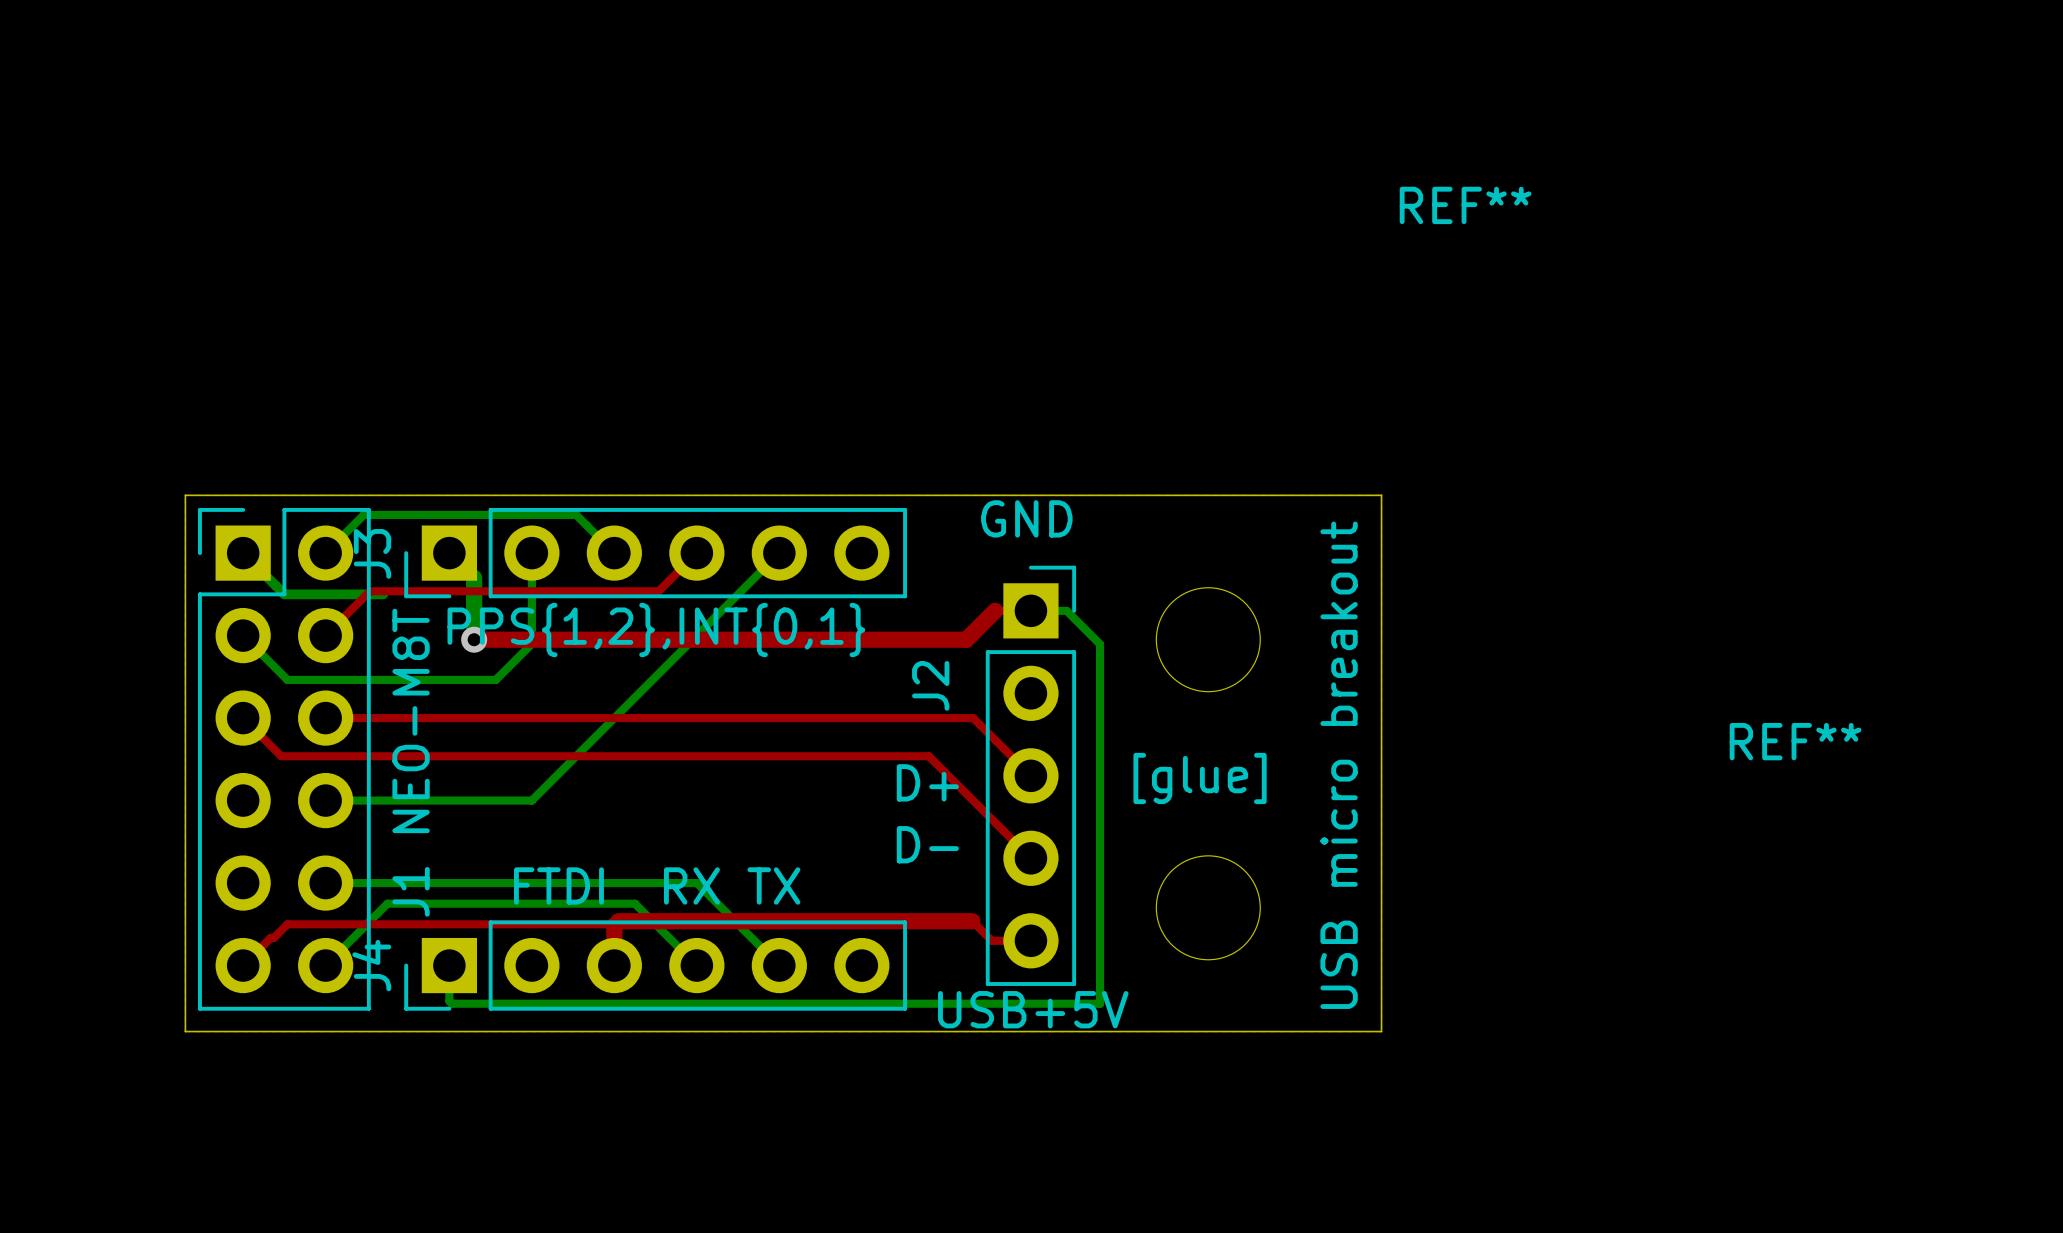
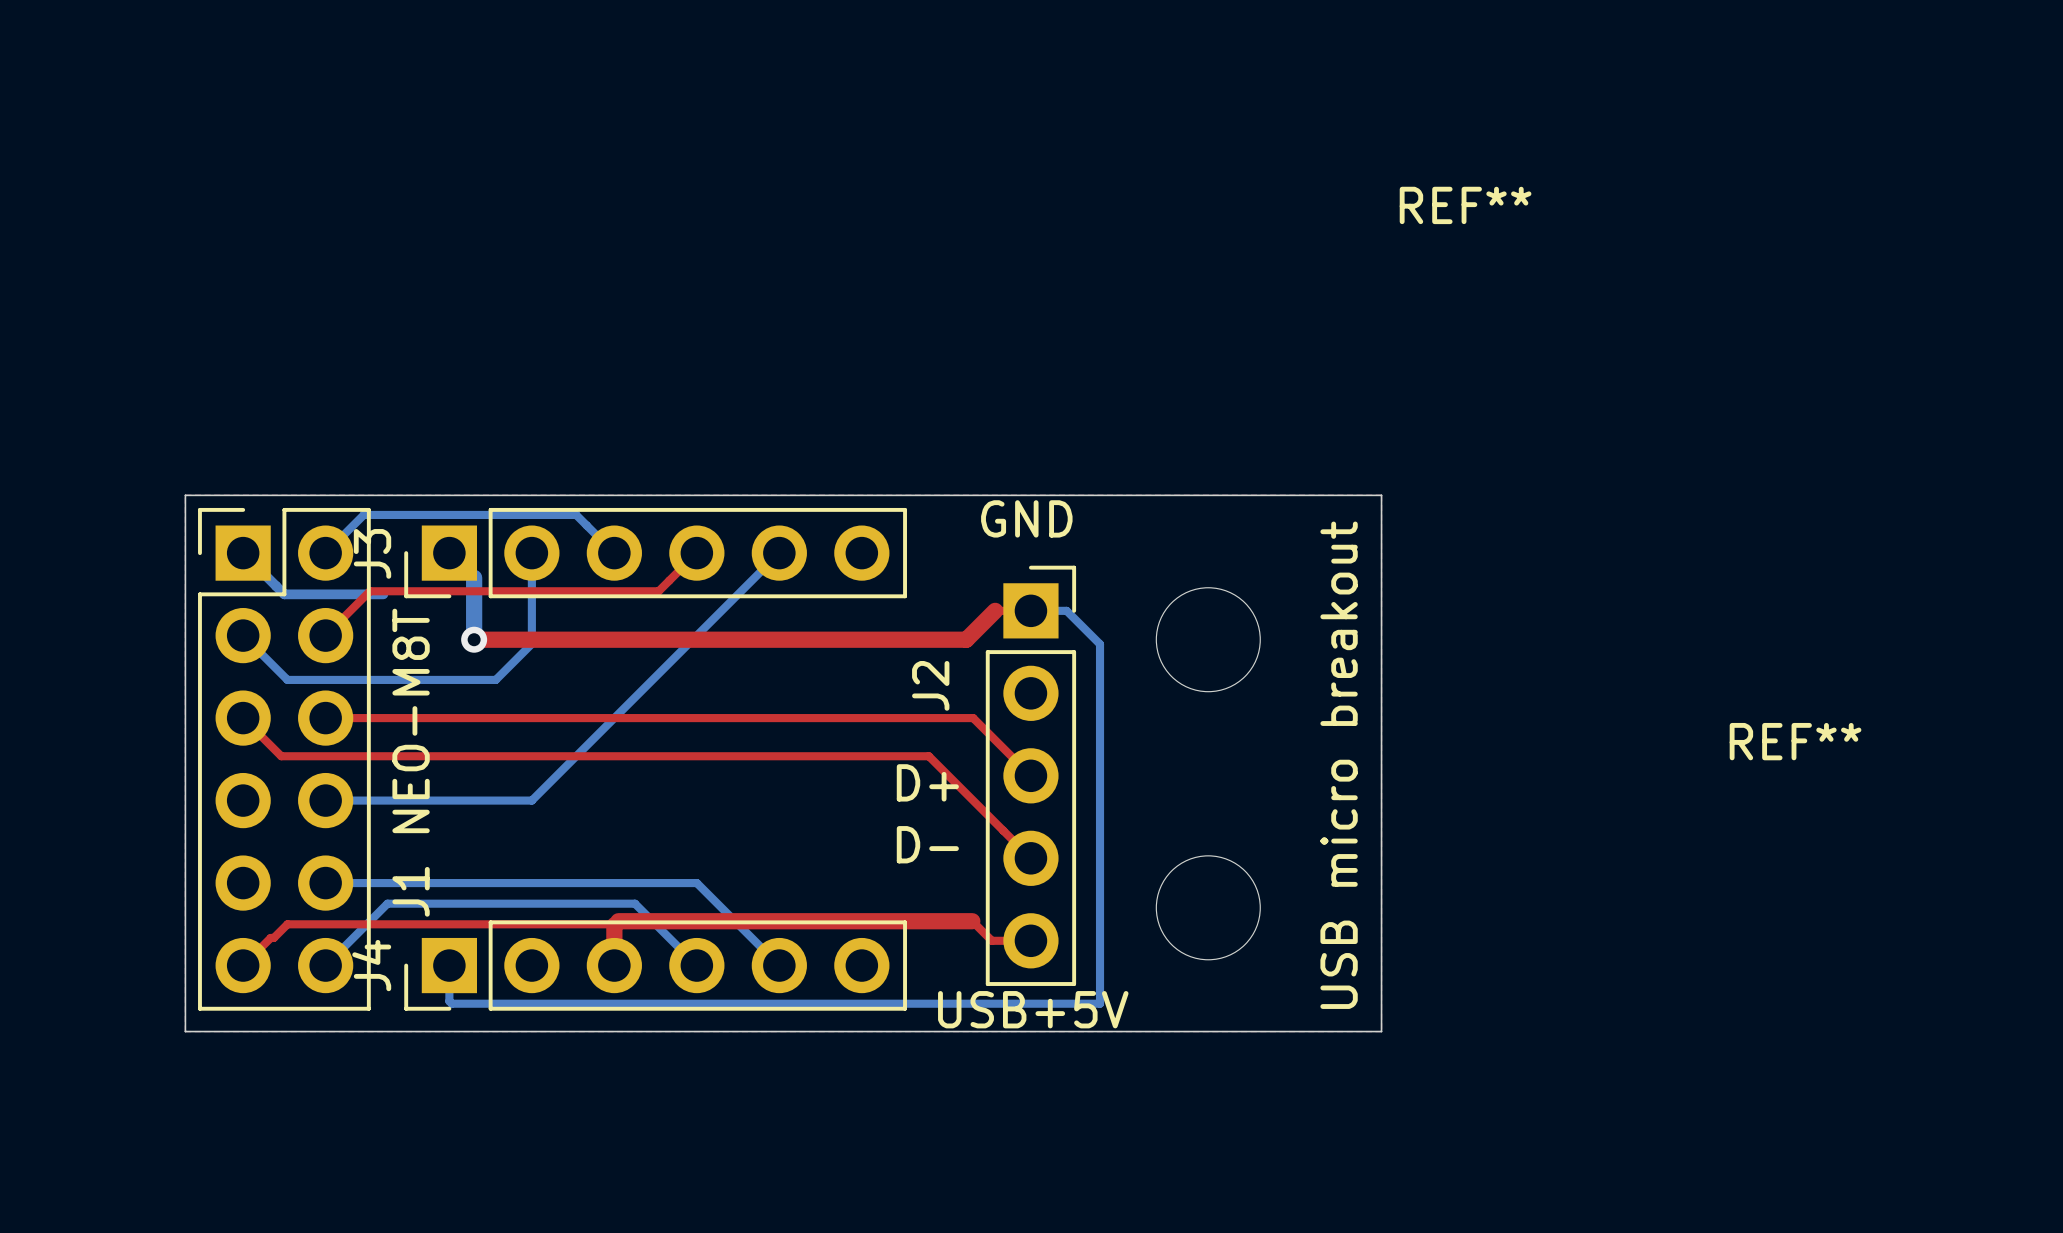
text: PPS{1,2},INT{0,1} (656, 630) -> none
text: [glue] (1200, 778) -> none
text: FTDI RX TX (657, 885) -> none

